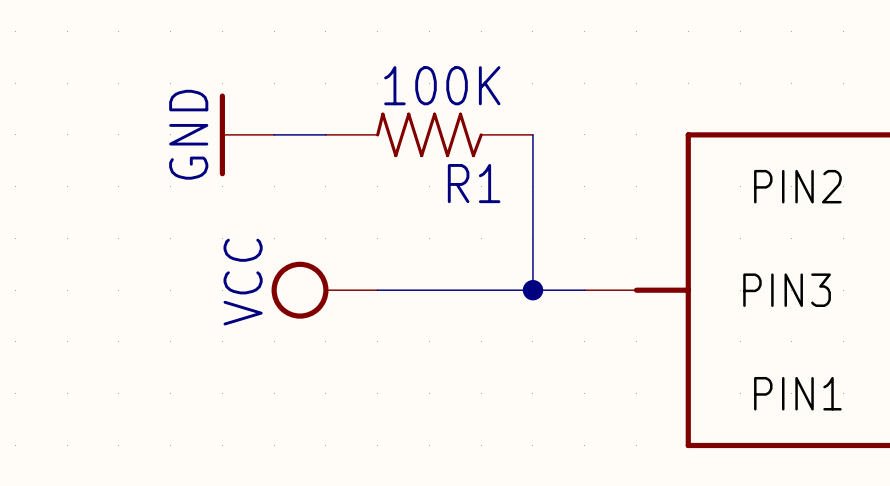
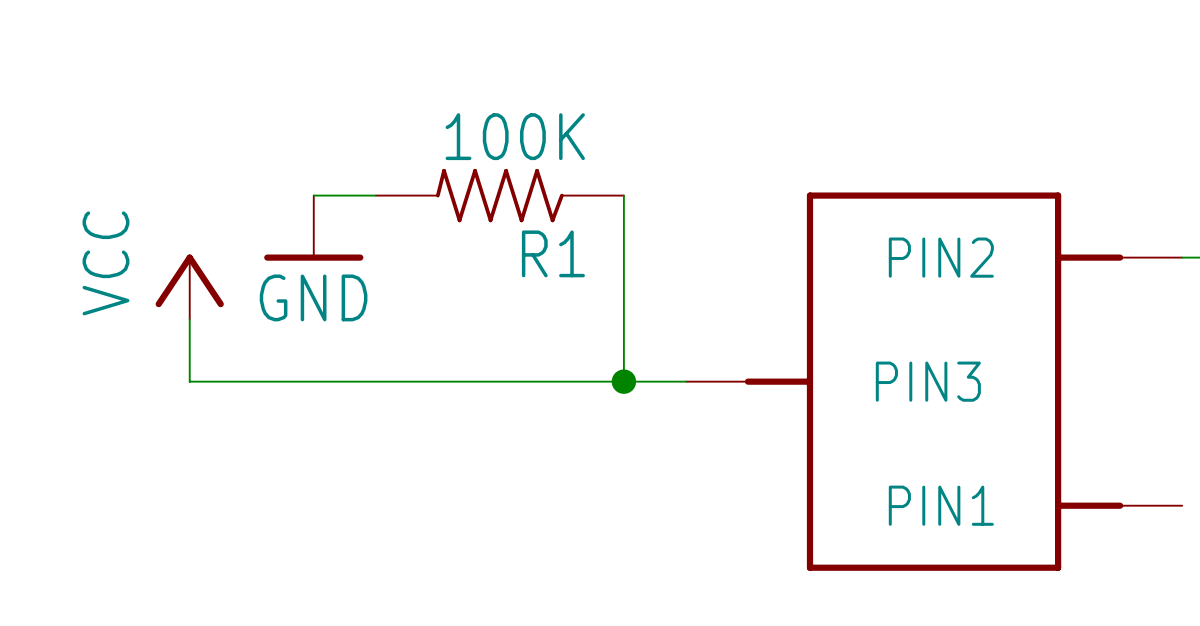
power symbol rotation: 0° (222, 134) -> 90° counterclockwise (313, 257)
power symbol: none -> VCC (189, 287)
wire: none -> (189, 319) (189, 381) (437, 381)
power symbol: VCC (324, 290) -> none

